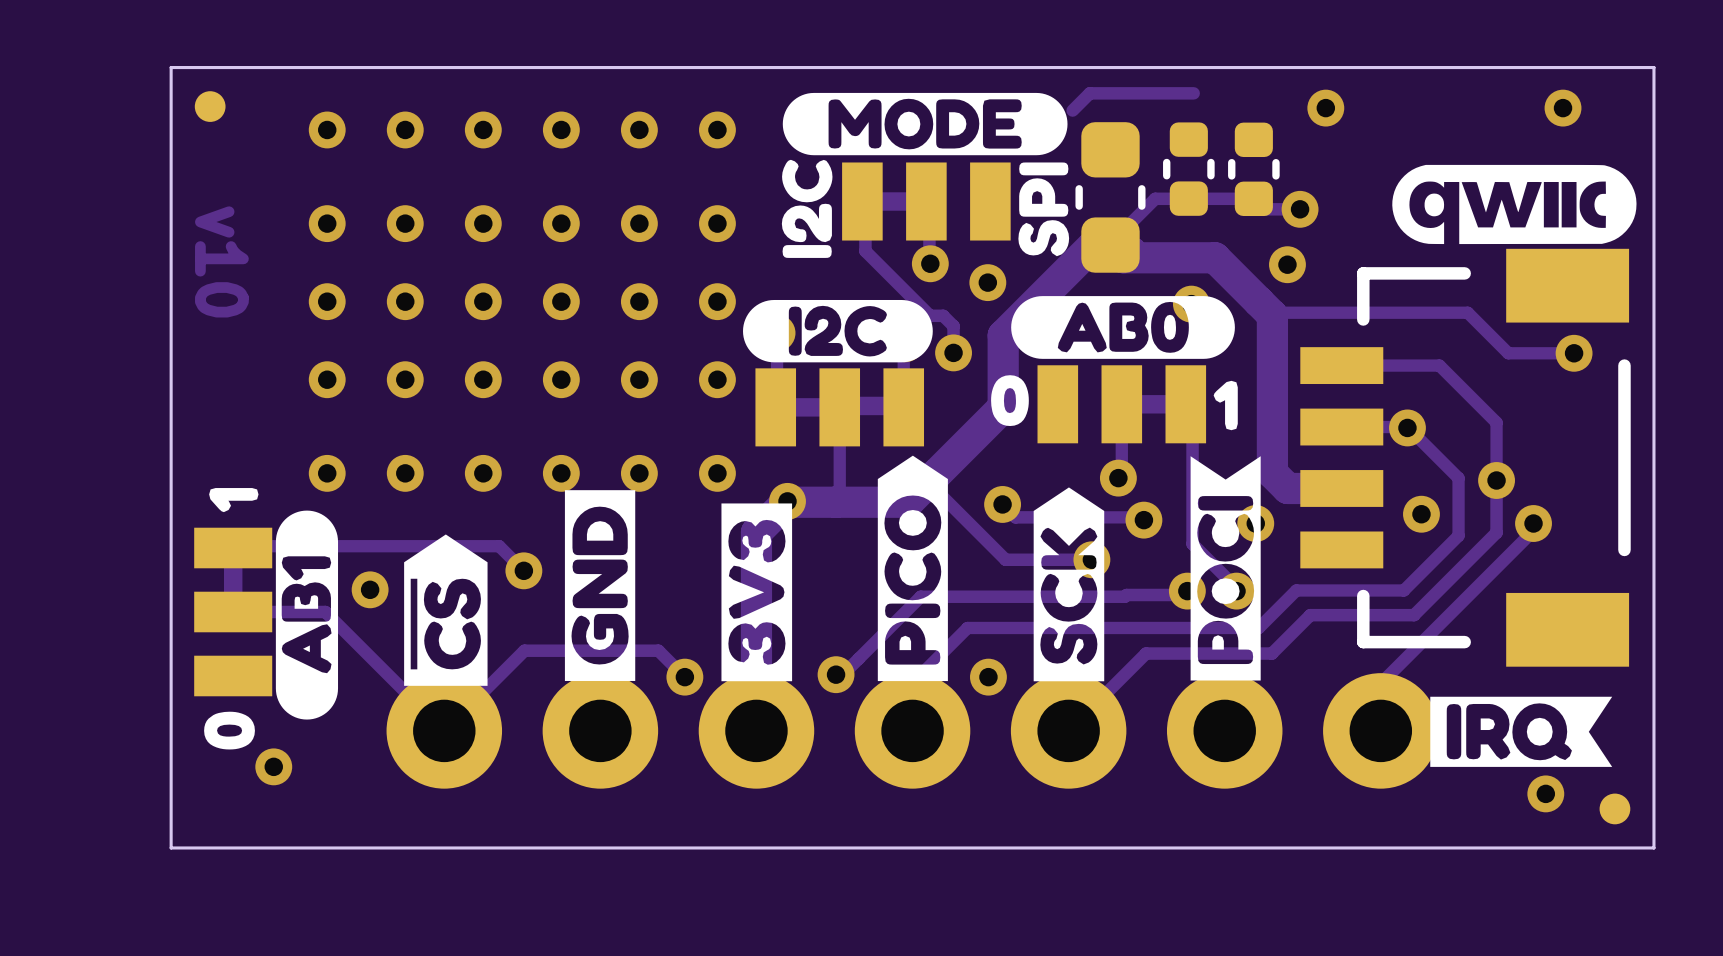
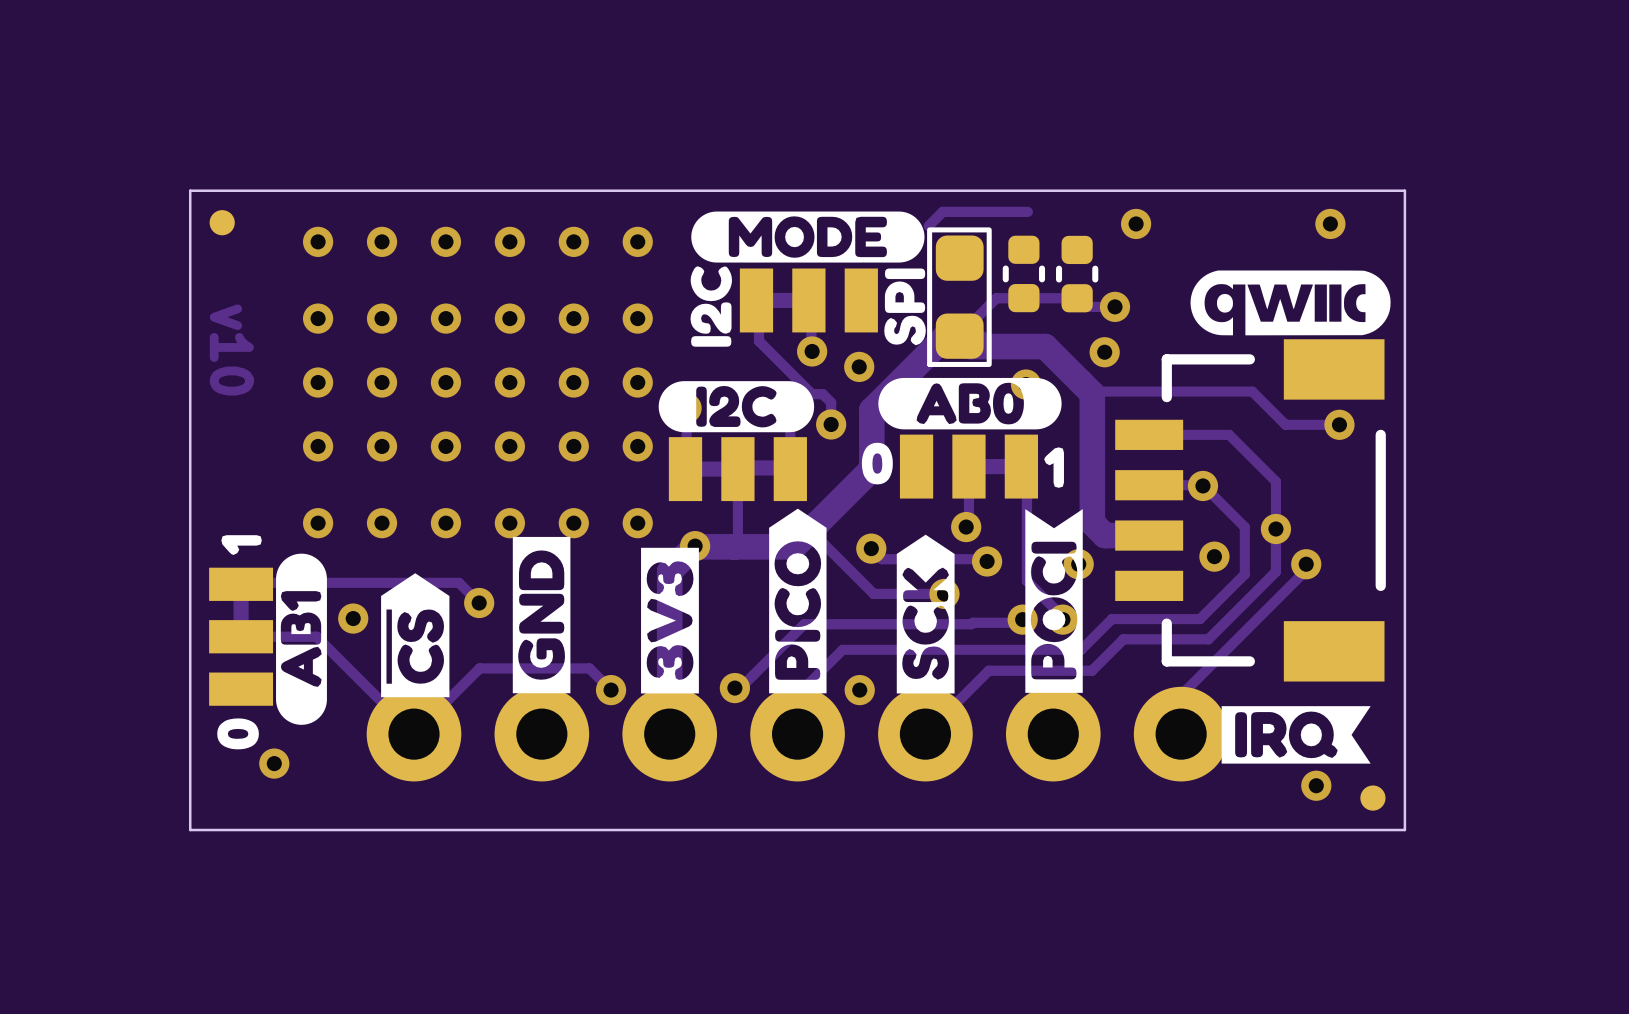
part footprint: [1075, 122, 1146, 273] -> [927, 227, 992, 367]

